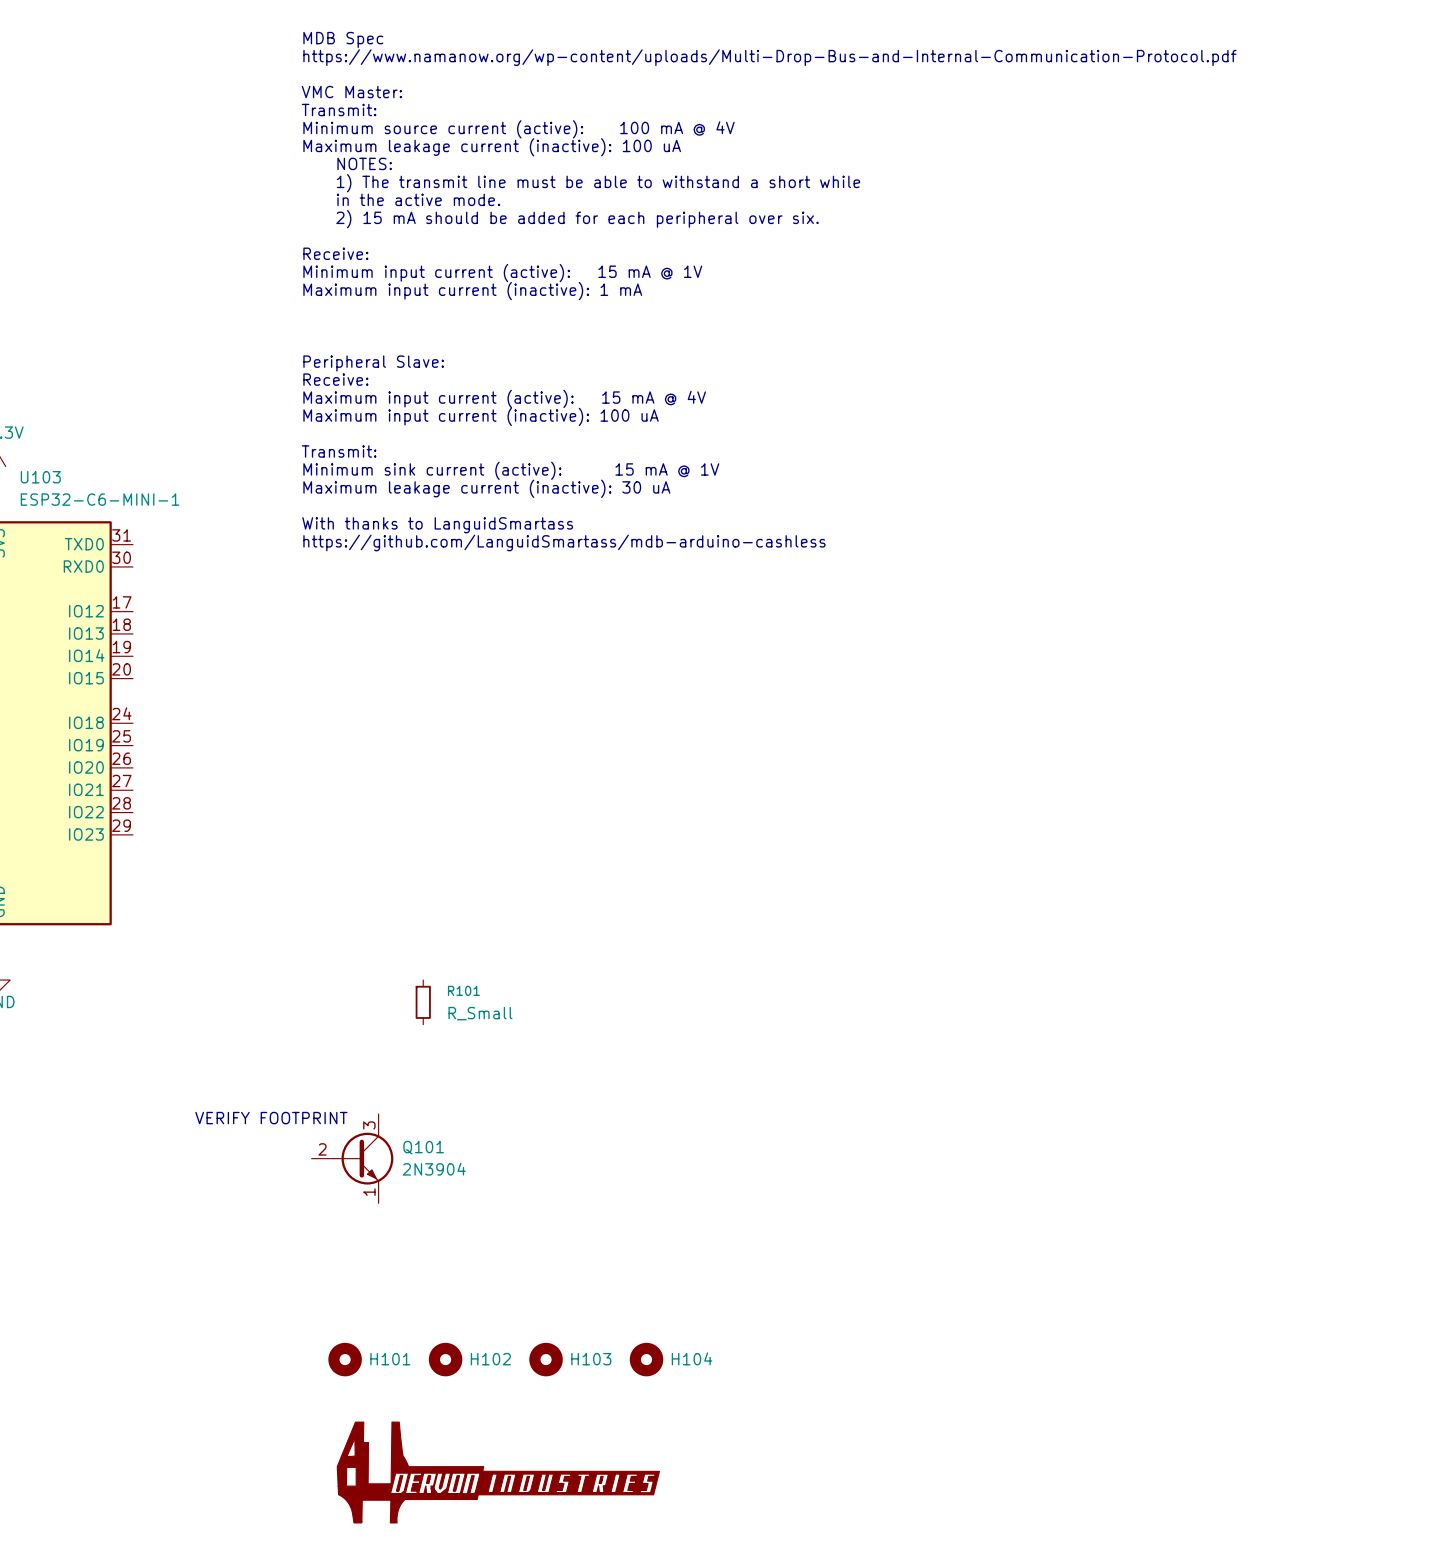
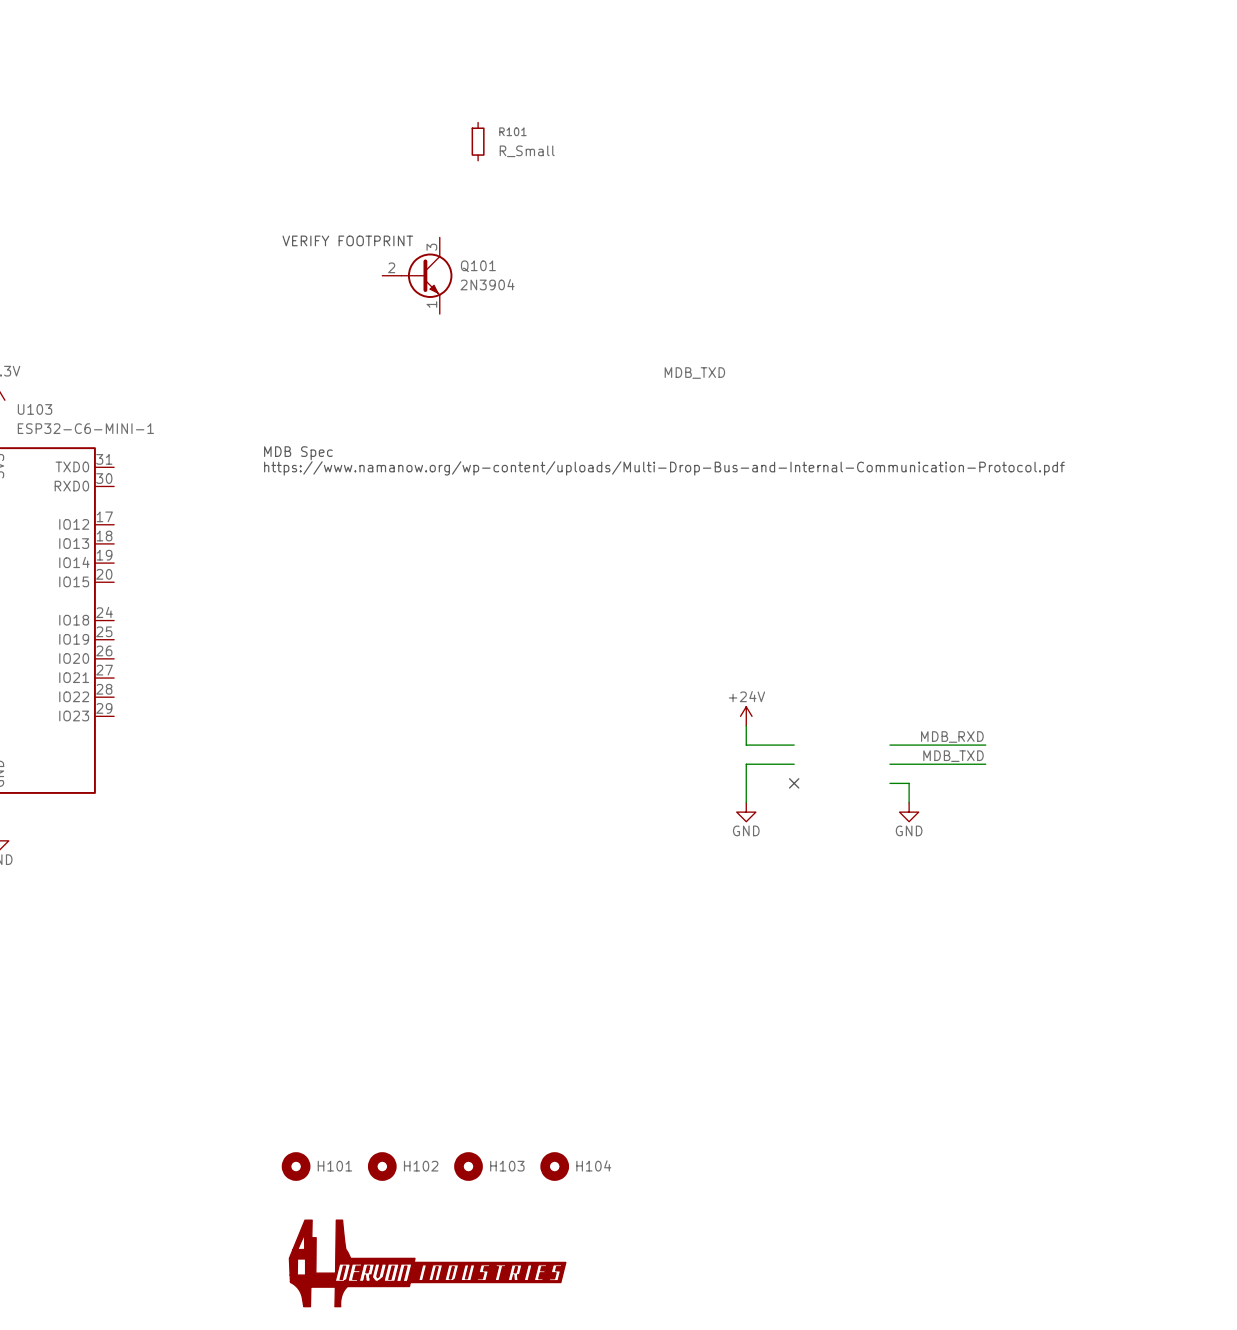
text: MDB Spec (343, 39) -> none
text: https://www.namanow.org/wp-content/uploads/Multi-Drop-Bus-and-Internal-Communication-Protocol.pdf (769, 57) -> none
text: VMC Master: (351, 92) -> none
text: Transmit: (339, 110) -> none
text: Minimum source current (active): 100 mA @ 4V (519, 129) -> none
text: Maximum leakage current (inactive): 100 uA (492, 147) -> none
text: NOTES: (364, 163) -> none
text: 1) The transmit line must be able to withstand a short while (598, 183) -> none
text: in the active mode. (418, 199) -> none
text: 2) 15 mA should be added for each peripheral over six. (577, 219) -> none
text: Receive: (335, 253) -> none
text: Minimum input current (active): 15 mA @ 1V (502, 273) -> none
text: none -> VERIFY FOOTPRINT (347, 240)
text: Maximum input current (inactive): 1 mA (472, 291) -> none
text: Peripheral Slave: (373, 363) -> none
text: Receive: (335, 379) -> none
text: Maximum input current (active): 15 mA @ 4V (504, 398) -> none
text: Maximum input current (inactive): 100 uA (481, 416) -> none
label: none -> MDB_TXD (694, 373)
text: Transmit: (339, 451) -> none
text: Minimum sink current (active): 15 mA @ 1V (511, 470) -> none
text: Maximum leakage current (inactive): 30 uA (486, 488) -> none
text: With thanks to LanguidSmartass (437, 525) -> MDB Spec (298, 453)
text: https://github.com/LanguidSmartass/mdb-arduino-cashless (564, 542) -> https://www.namanow.org/wp-content/uploads/Multi-Drop-Bus-and-Internal-Communication-Protocol.pdf (664, 468)
power symbol: none -> +24V (746, 716)
wire: none -> (746, 725) (746, 745) (794, 745)
label: none -> MDB_RXD (952, 736)
wire: none -> (889, 745) (985, 745)
label: none -> MDB_TXD (953, 756)
wire: none -> (794, 764) (746, 764) (746, 802)
wire: none -> (889, 764) (985, 764)
no-connect mark: none -> (794, 783)
wire: none -> (889, 783) (909, 783) (909, 802)
power symbol: none -> GND (746, 812)
power symbol: none -> GND (909, 812)
R101 position: (423, 1002) -> (478, 141)
text: VERIFY FOOTPRINT (271, 1118) -> none
Q101 position: (352, 1158) -> (417, 275)

